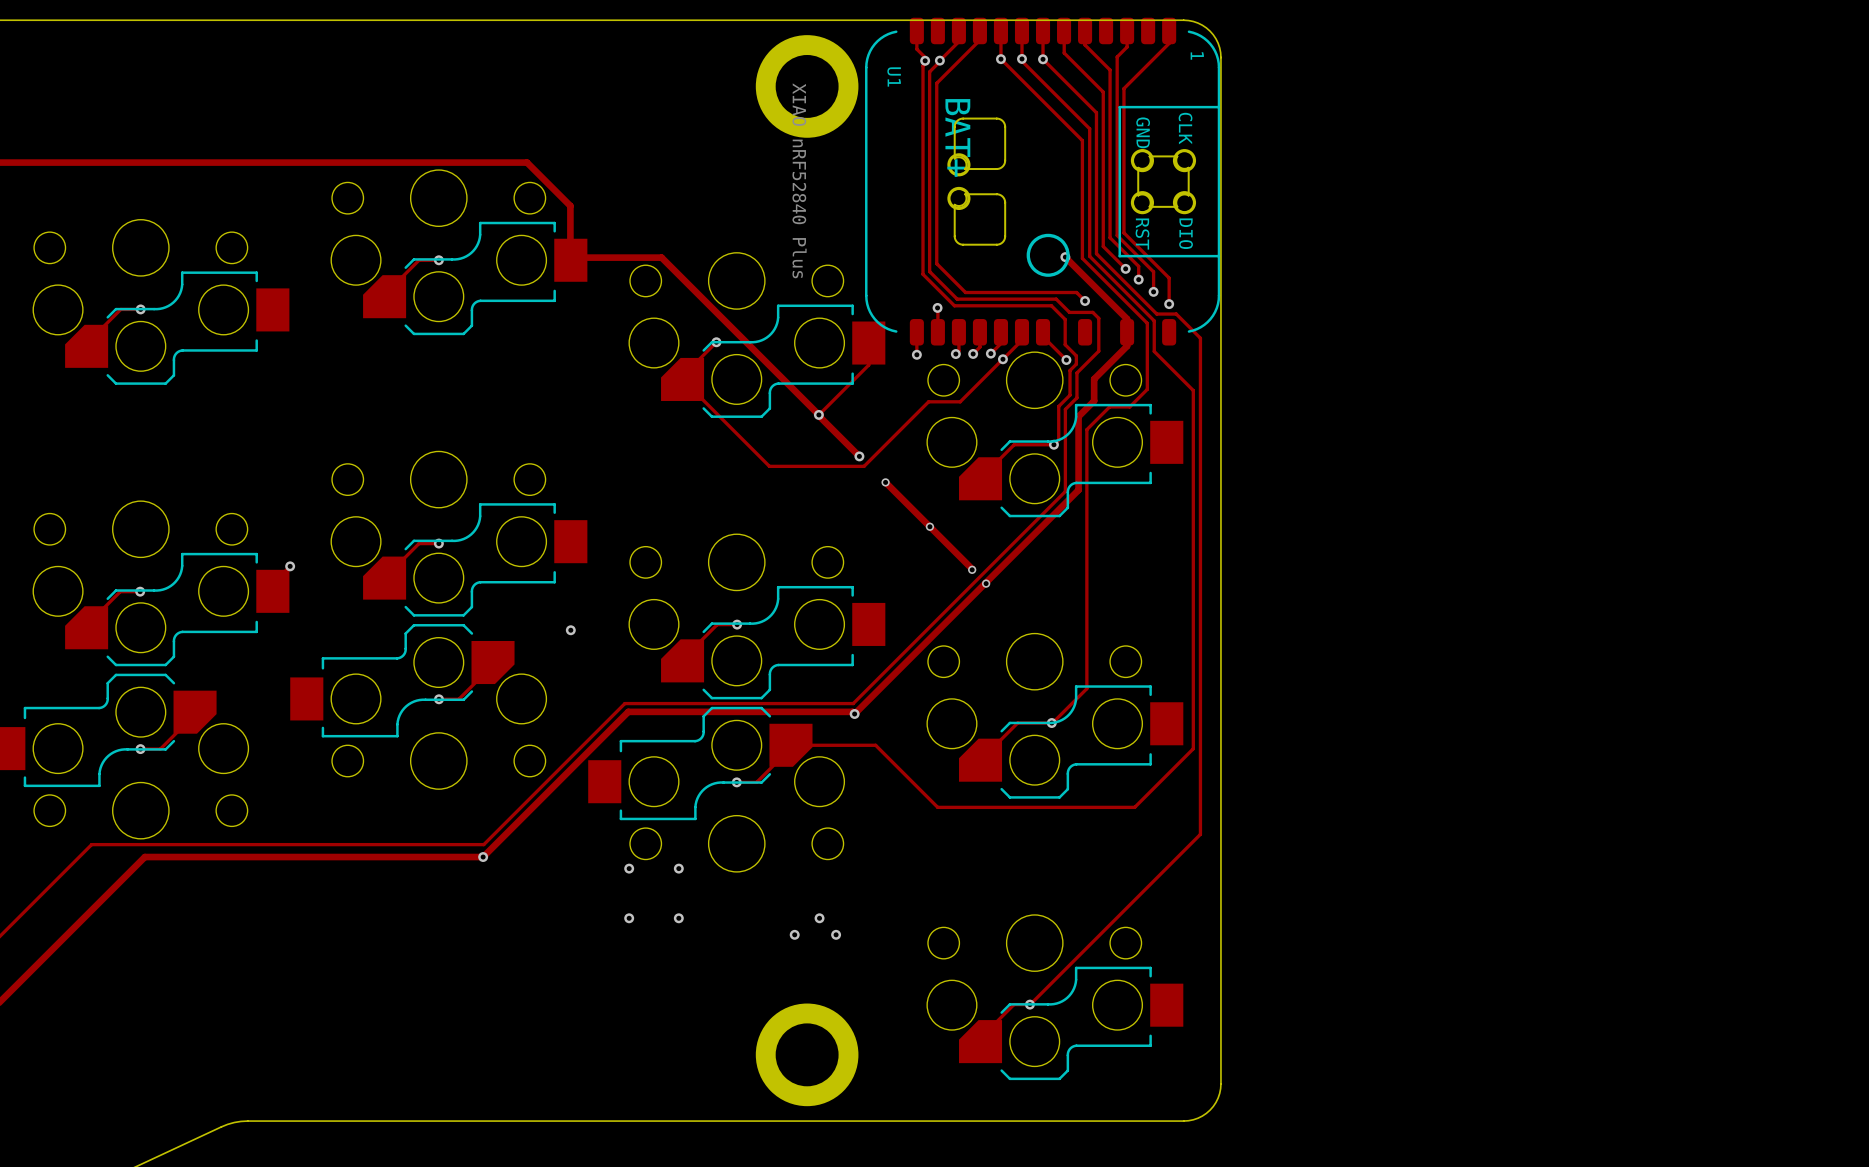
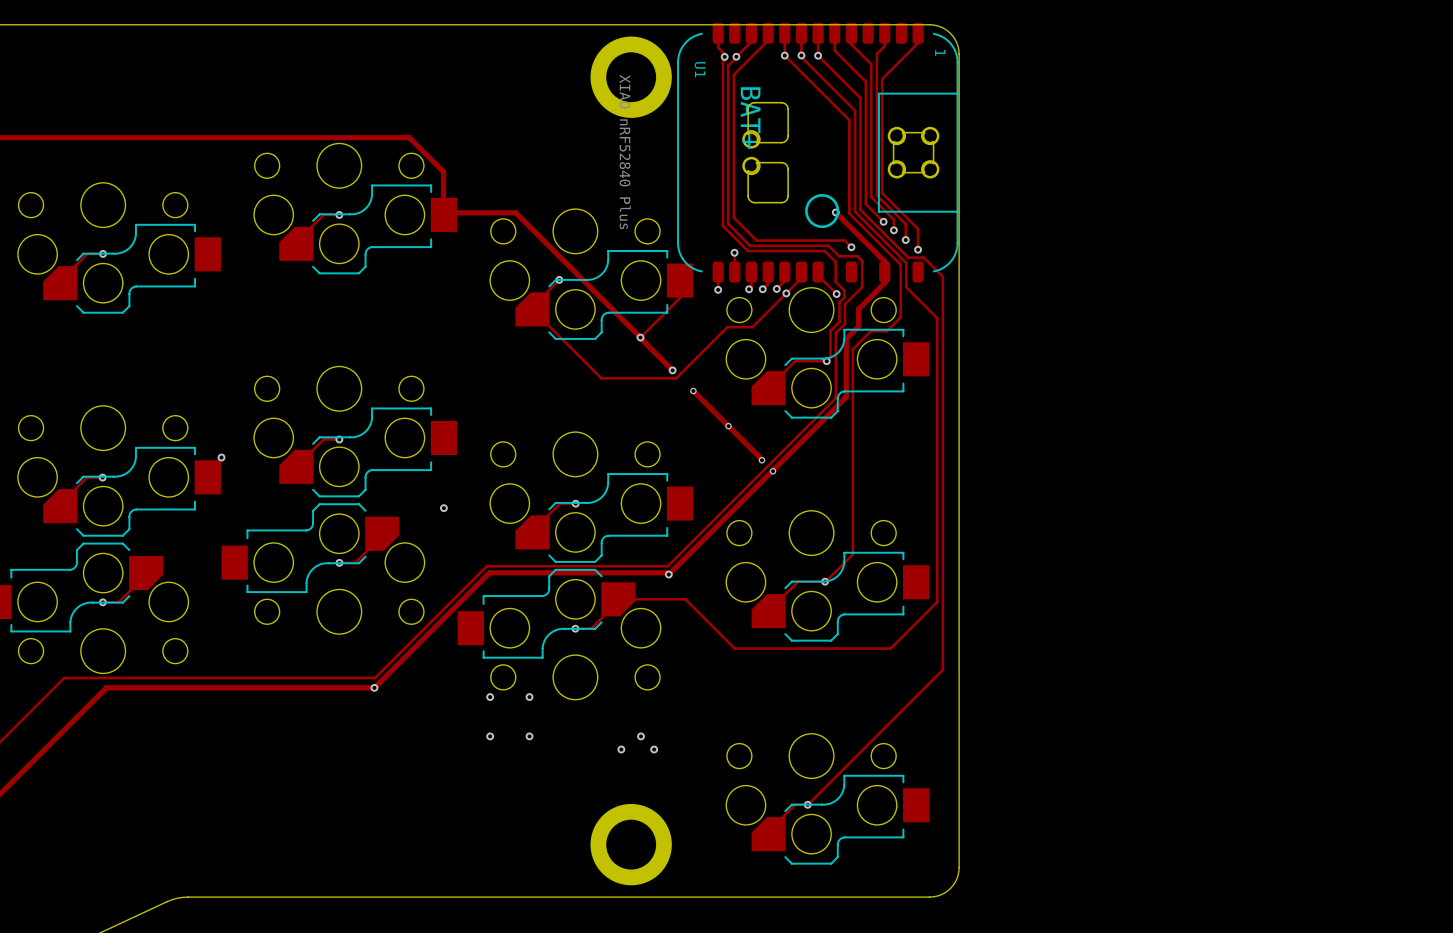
text: CLK (1185, 128) -> none
text: GND (1143, 132) -> none
text: DIO (1186, 233) -> none
text: RST (1142, 234) -> none

